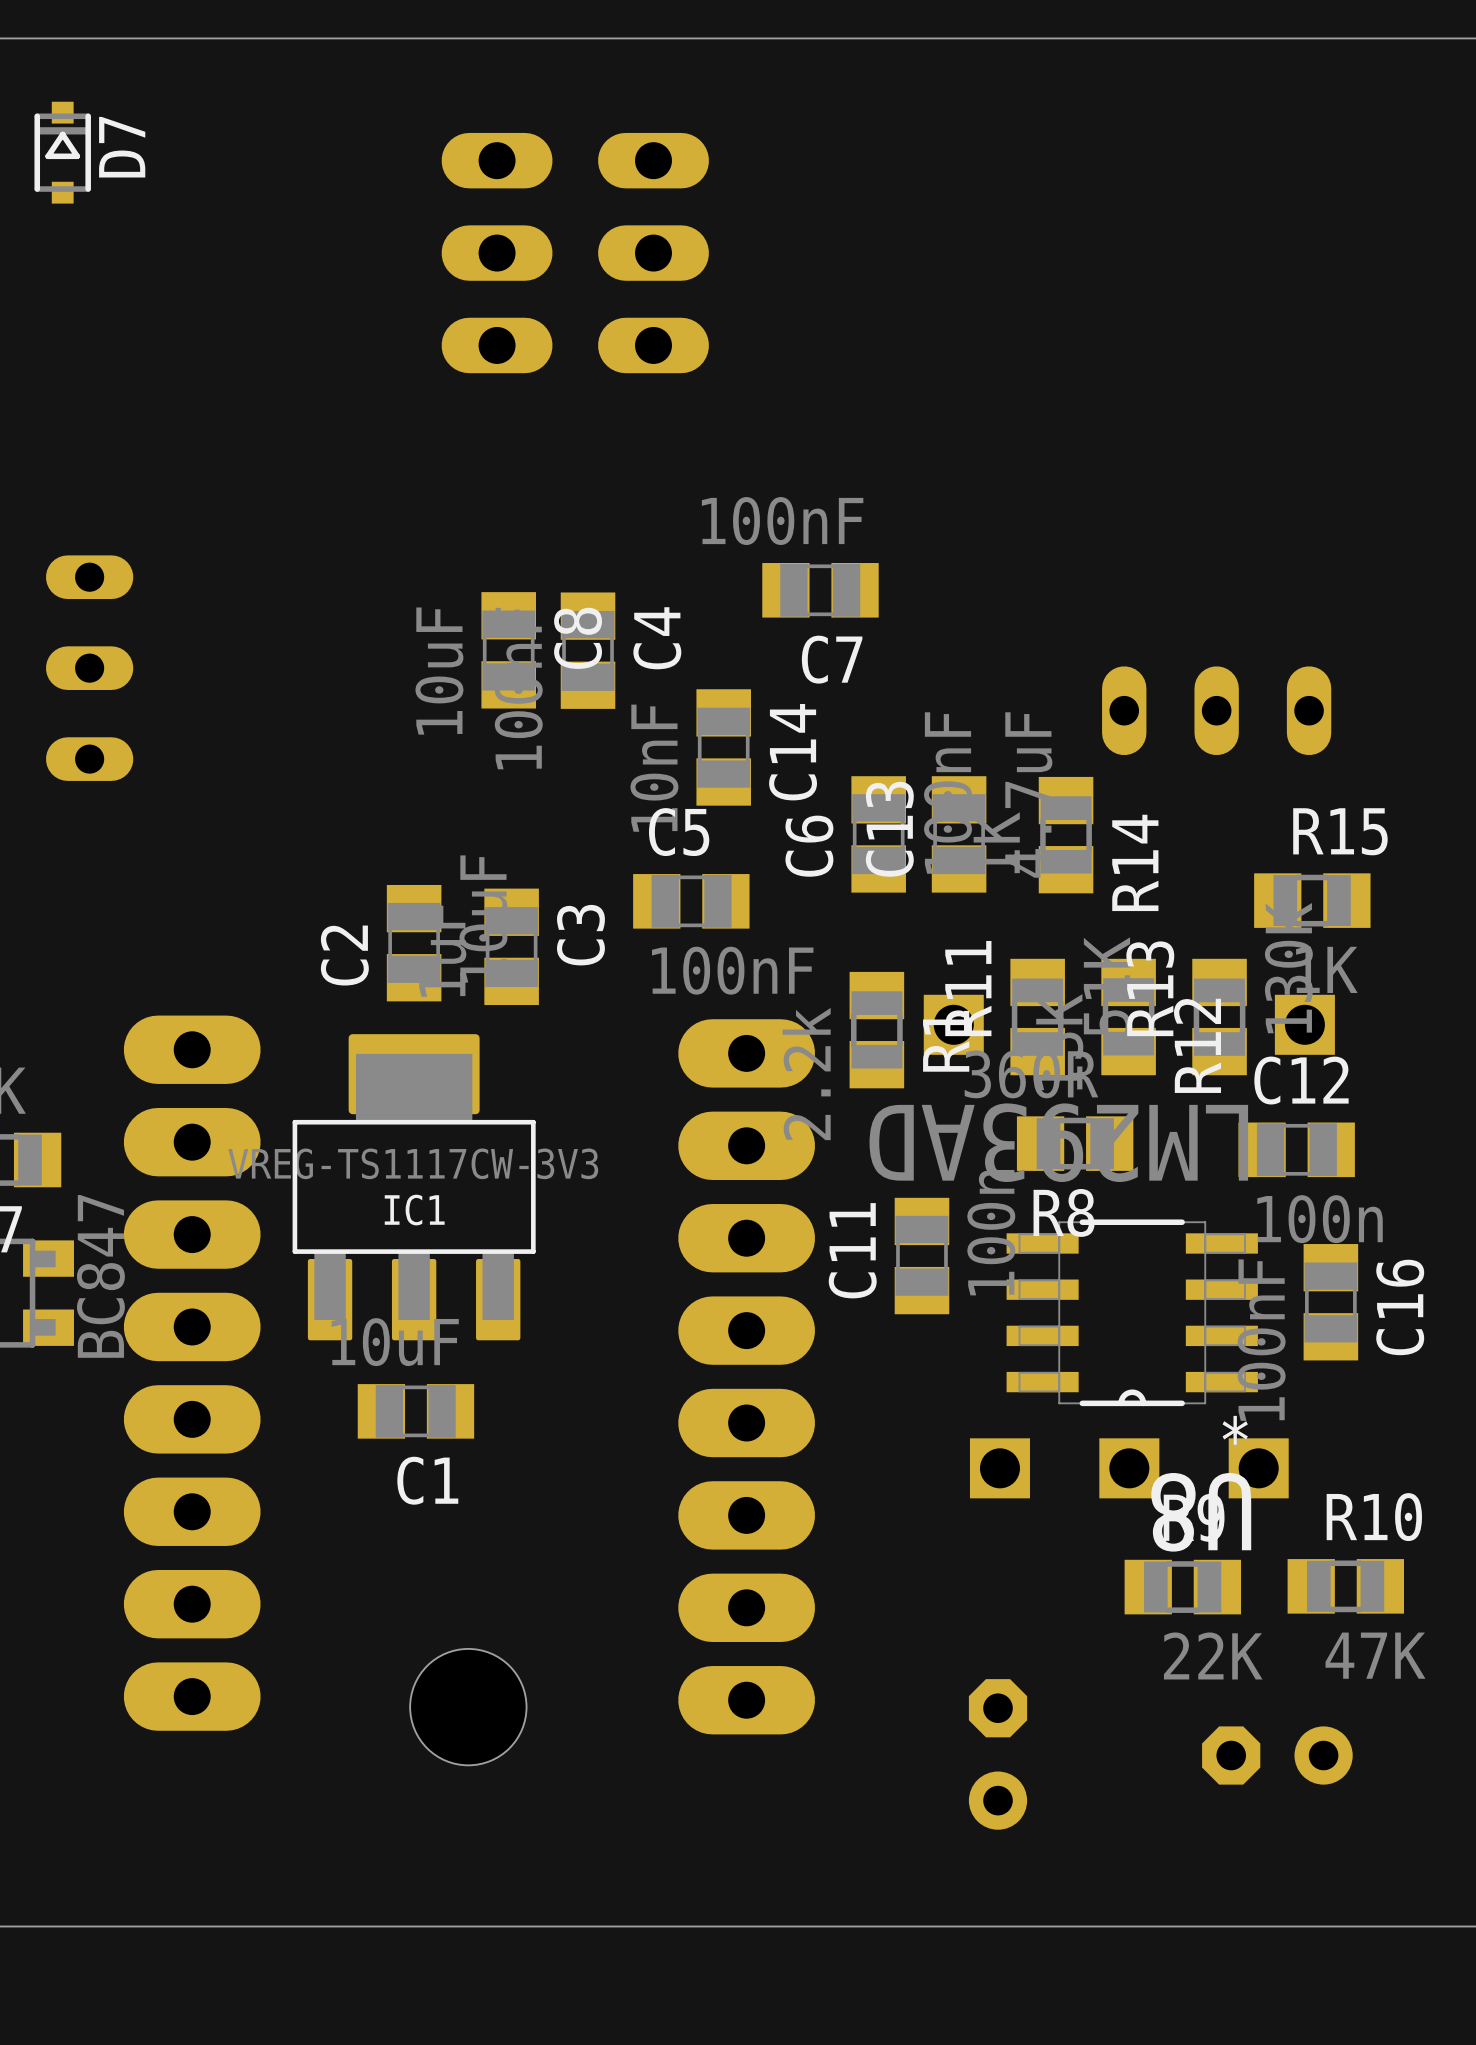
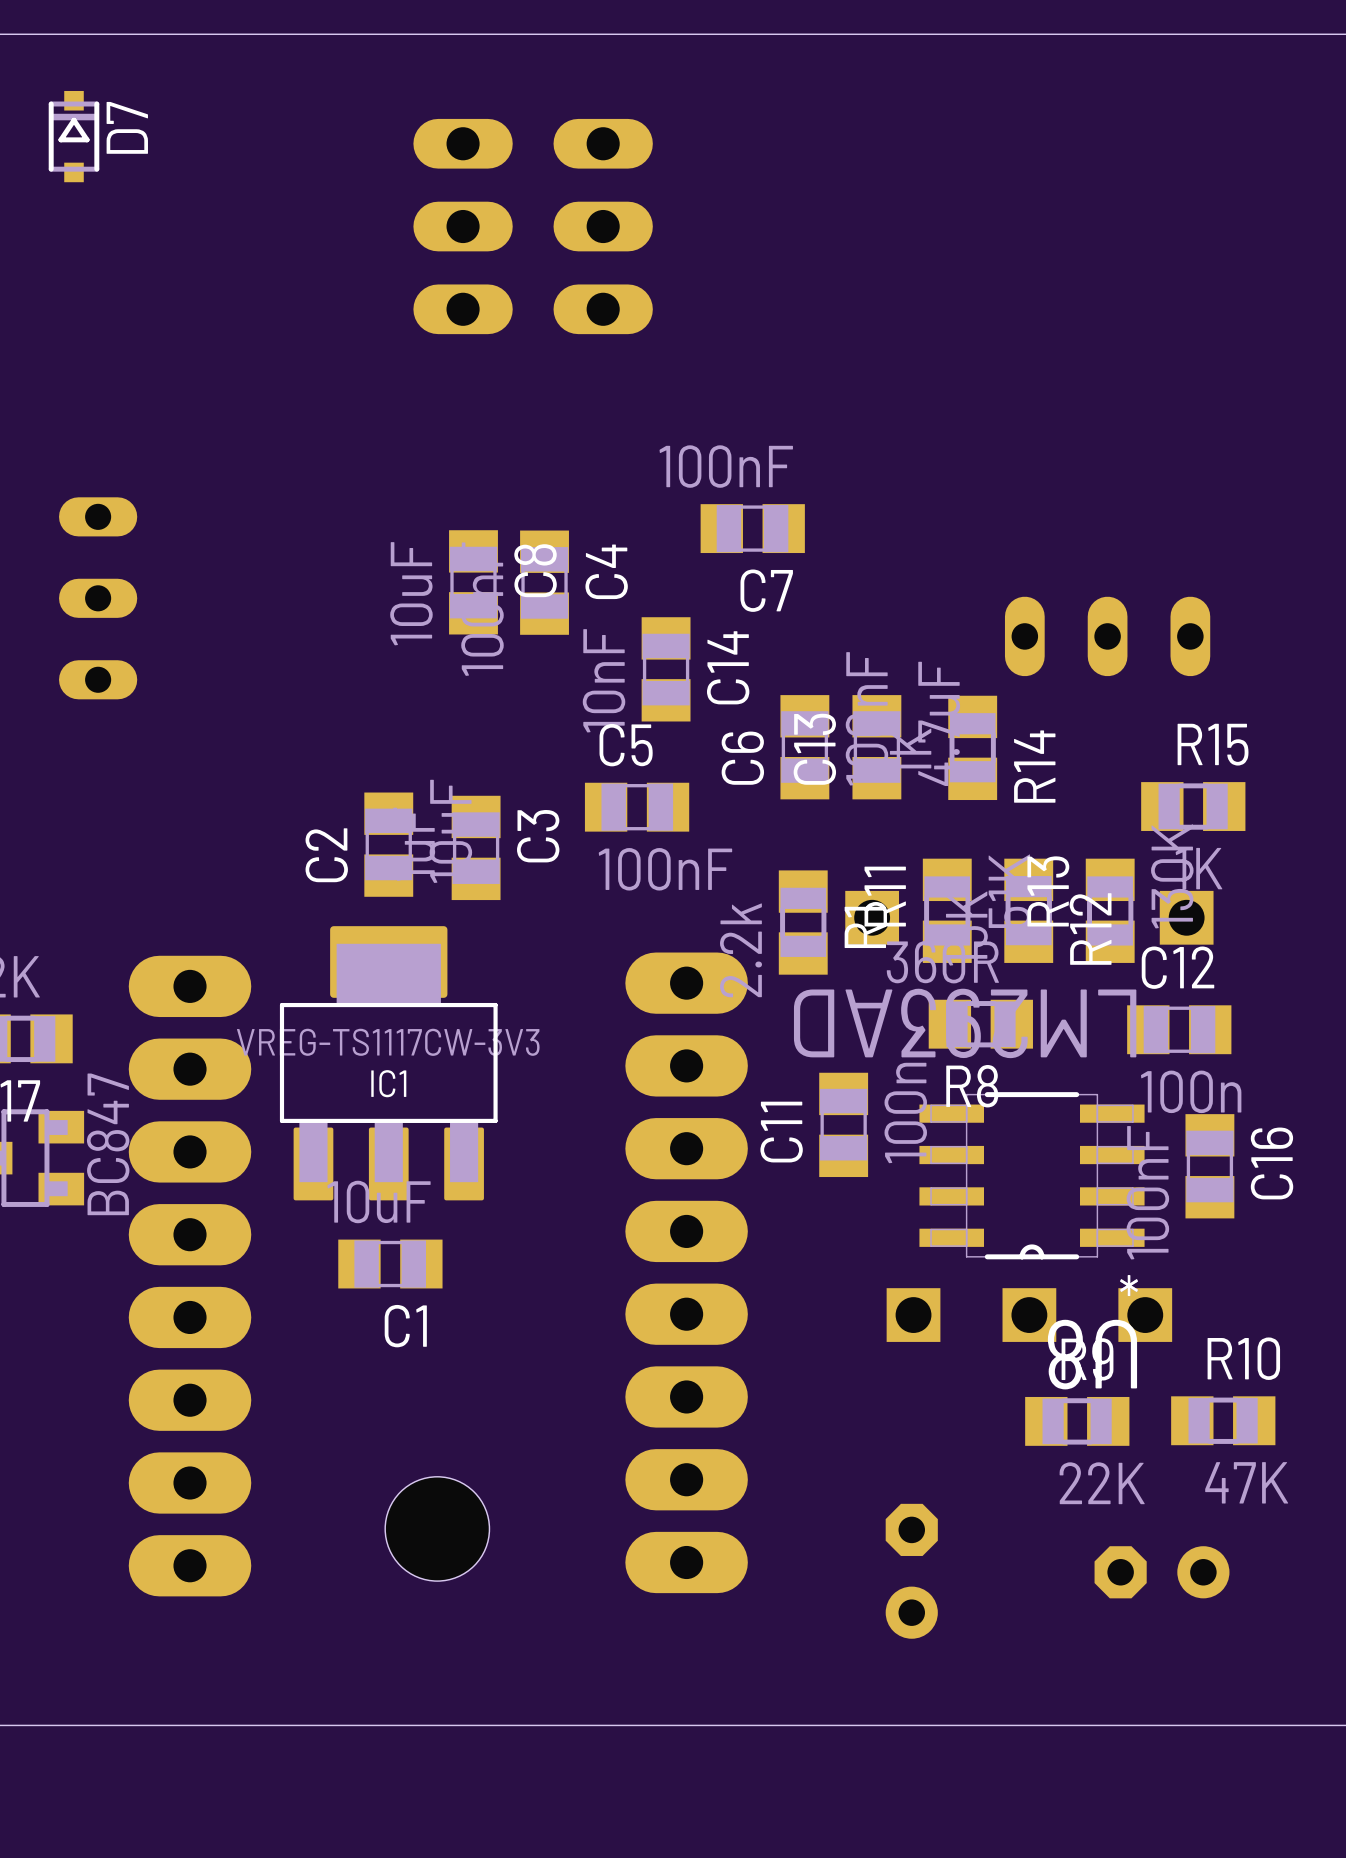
part position: (192, 1373) -> (190, 1276)
part position: (746, 1376) -> (686, 1272)

